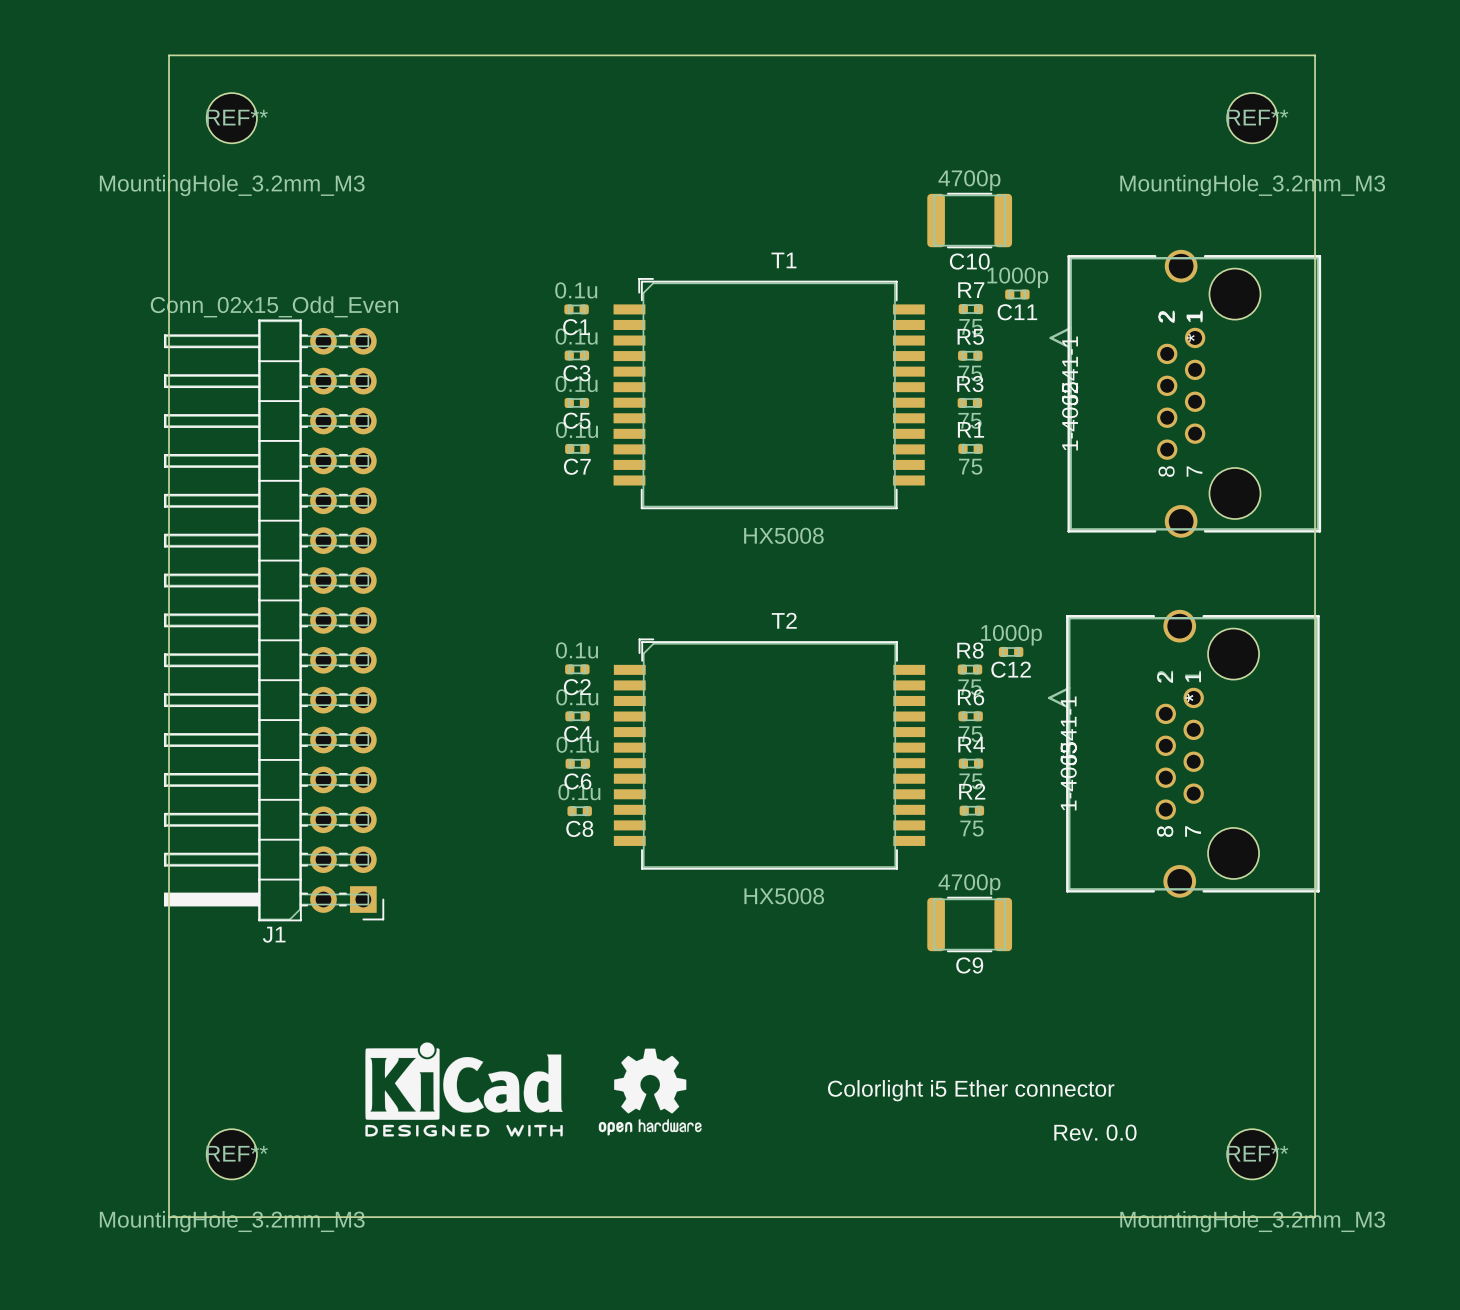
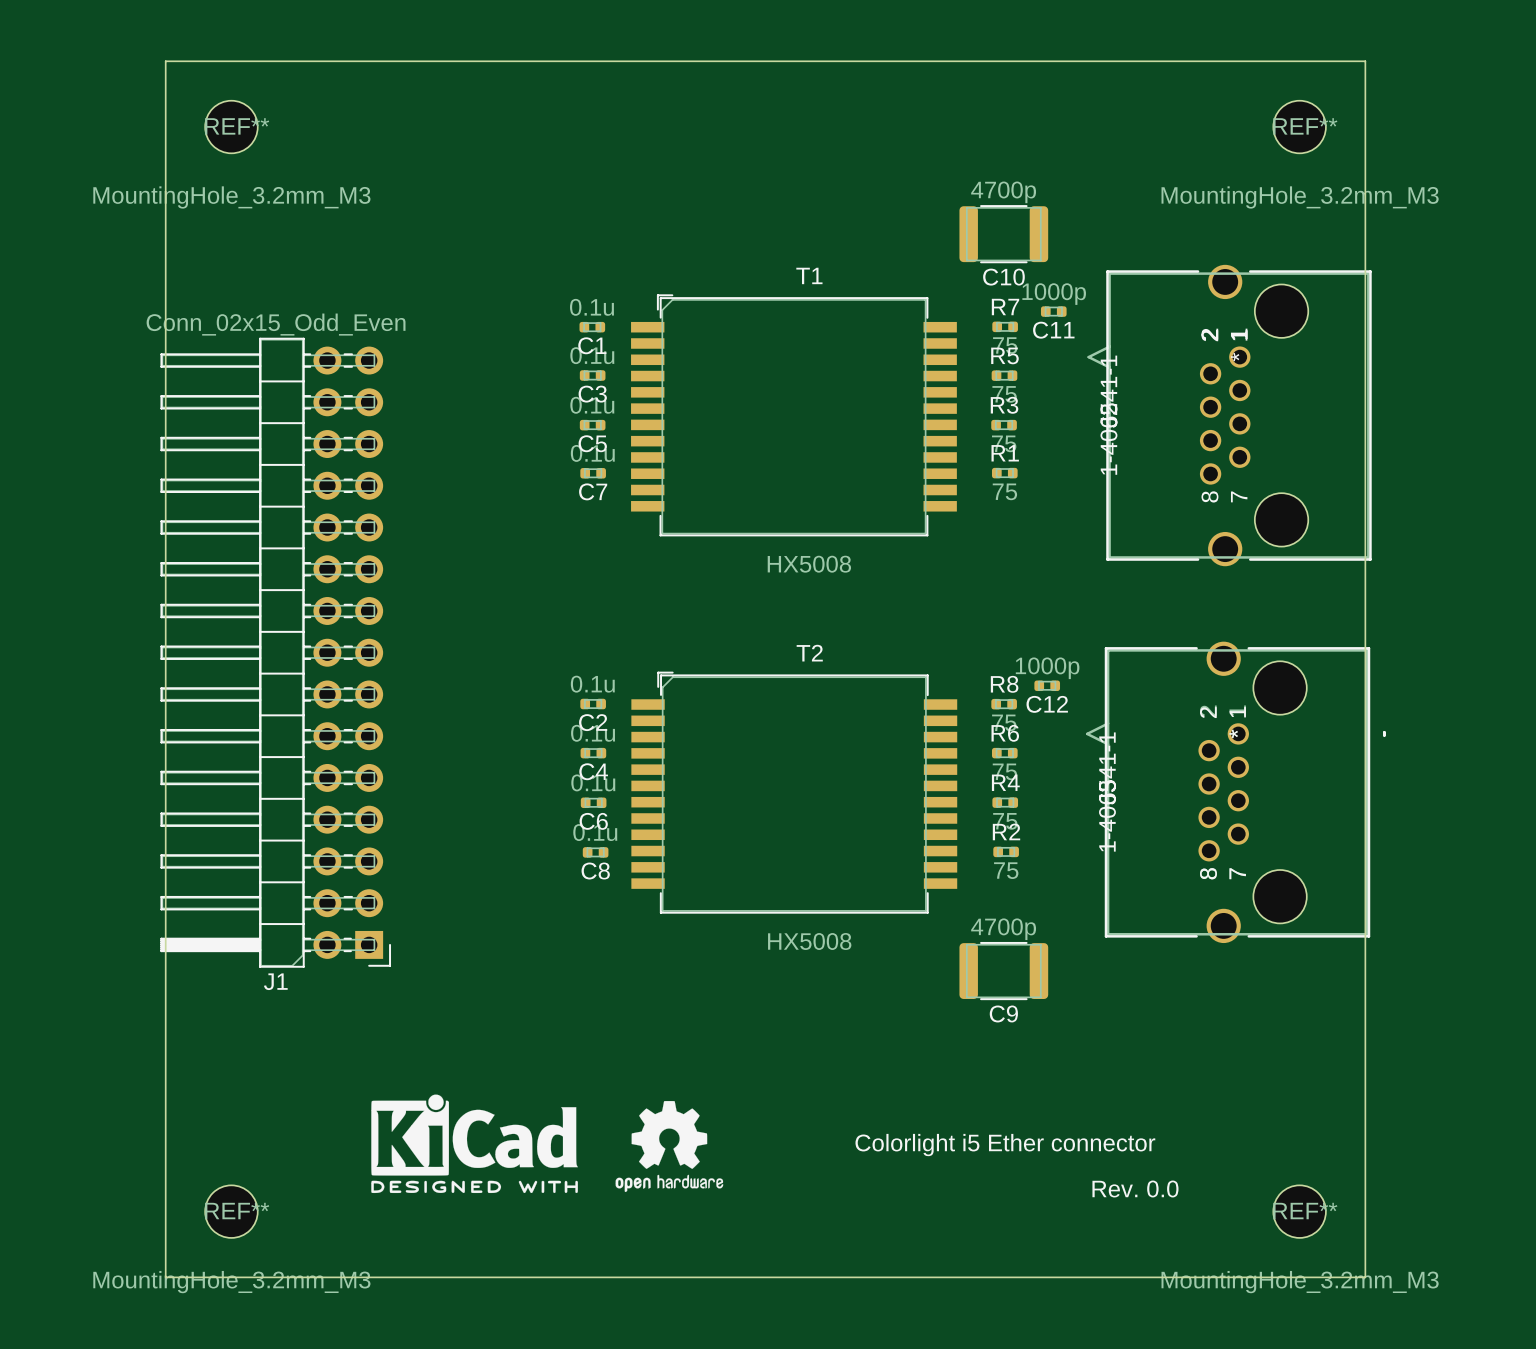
part footprint: [1048, 609, 1335, 898] -> [1085, 641, 1386, 944]

